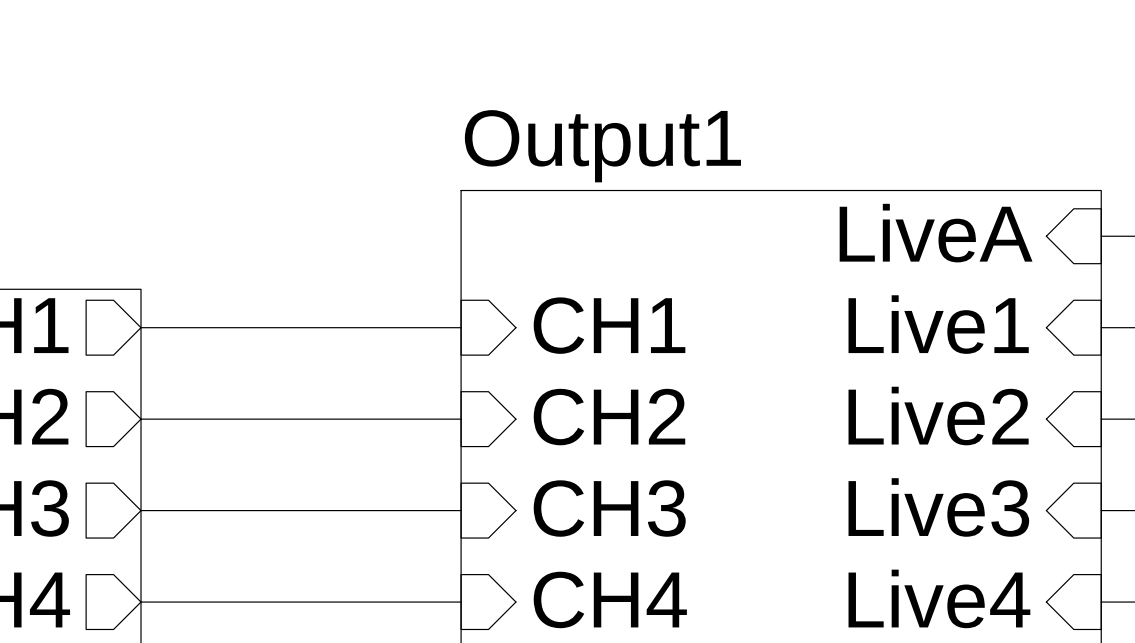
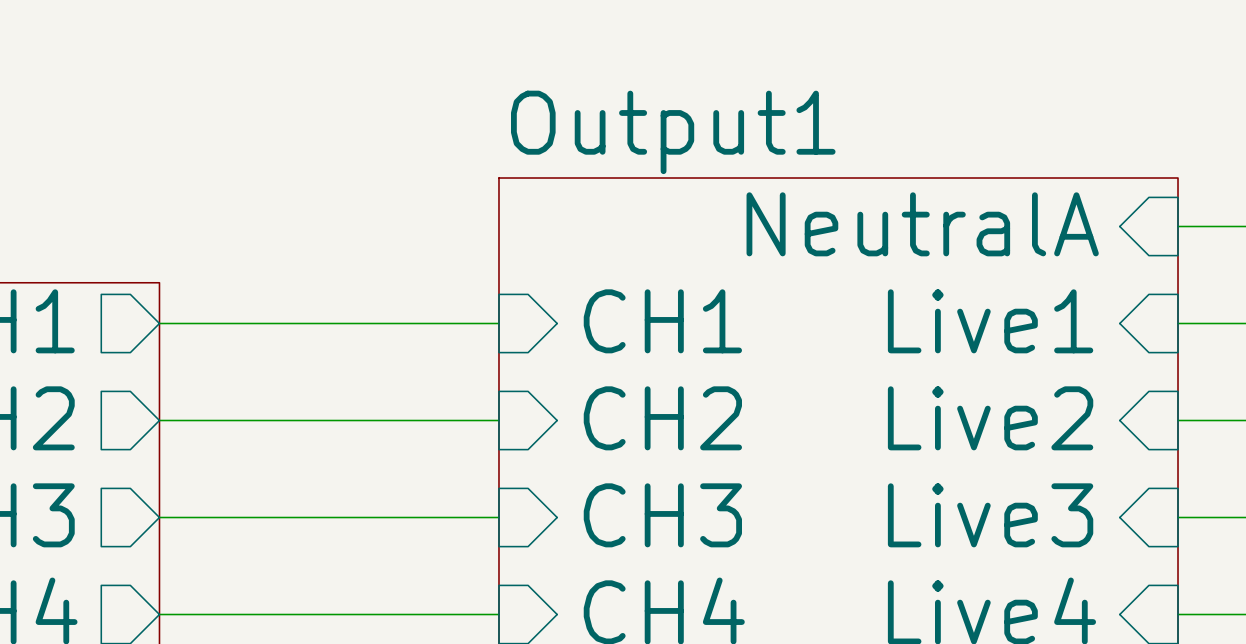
sheet pin: LiveA (936, 233) -> NeutralA (922, 224)

